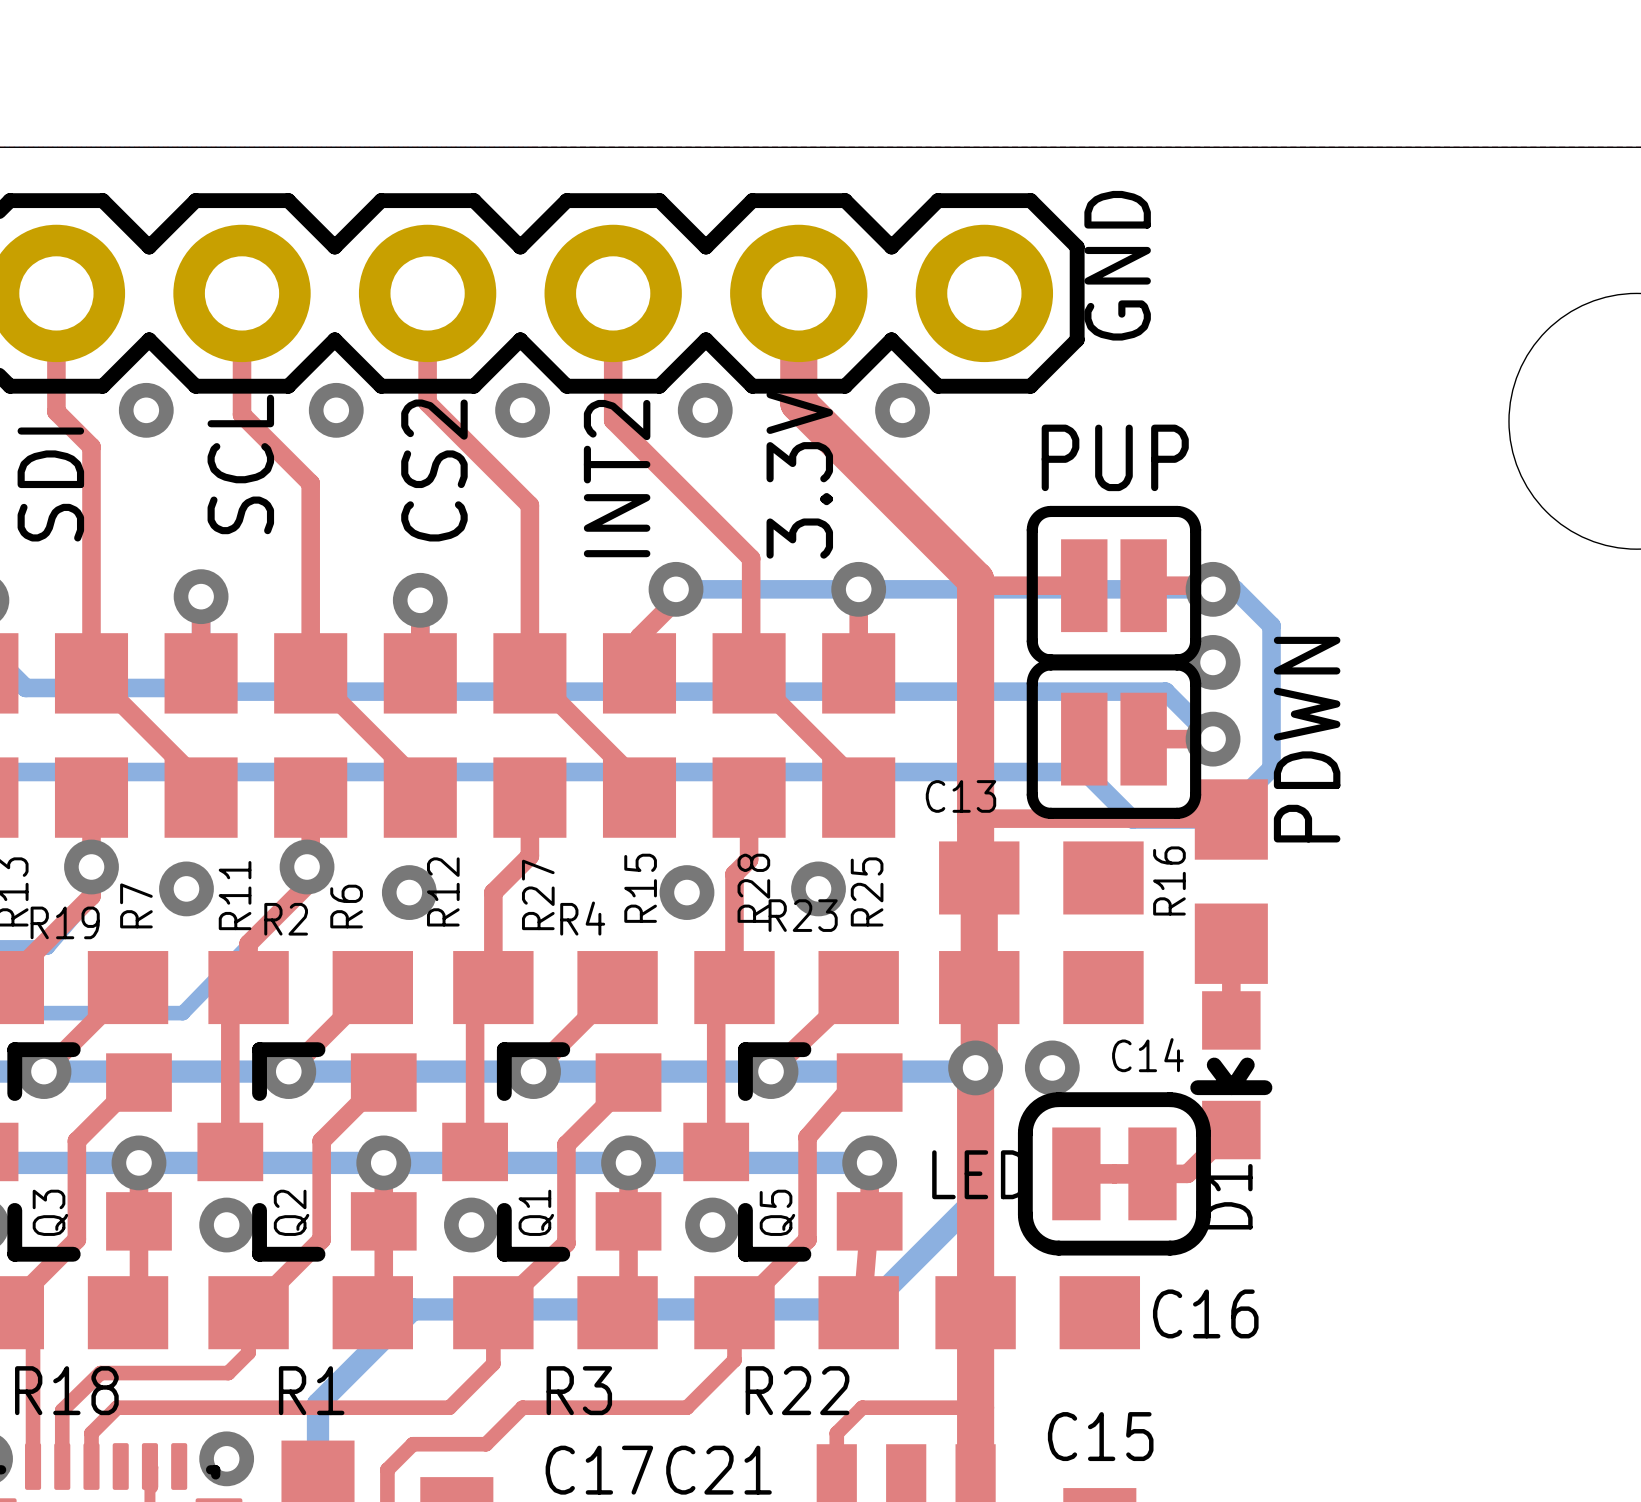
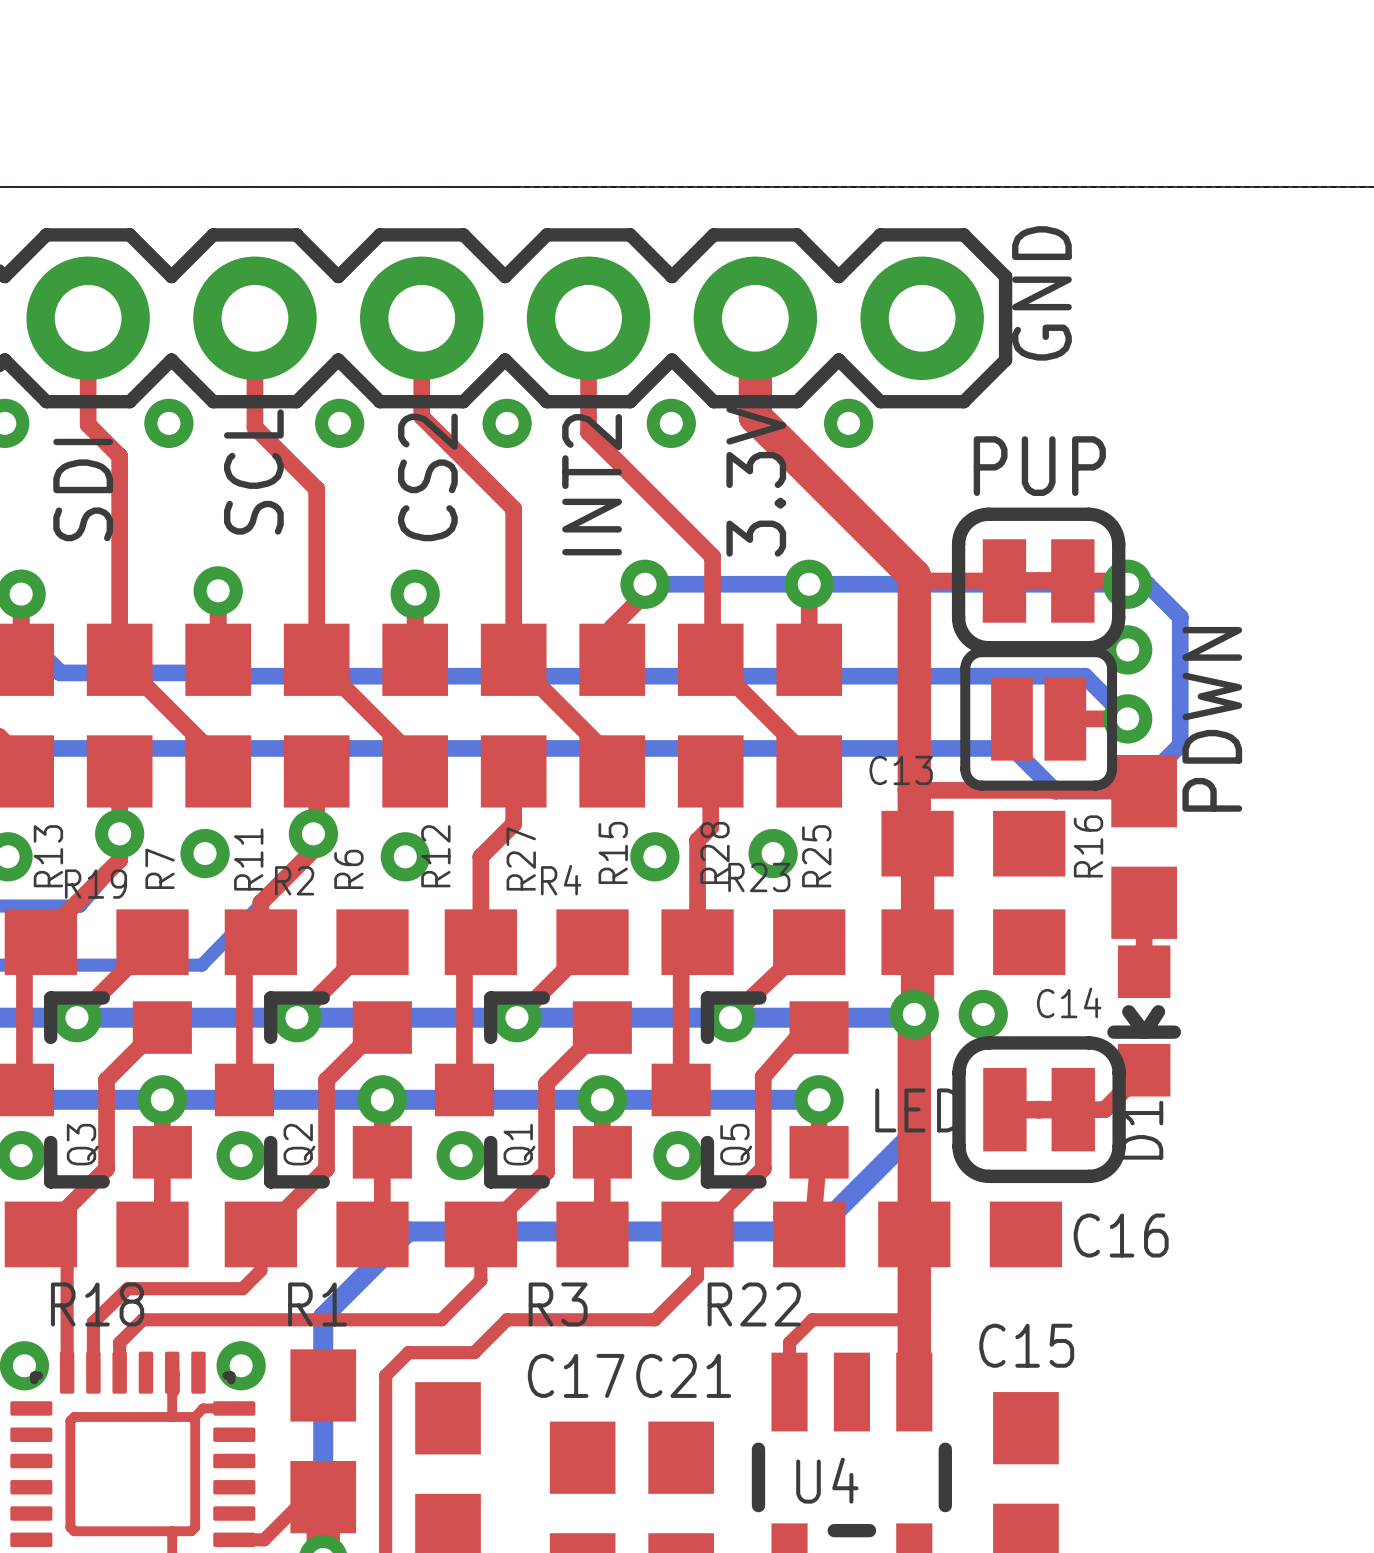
PUP footprint: [1026, 505, 1202, 666] -> [951, 507, 1126, 655]

